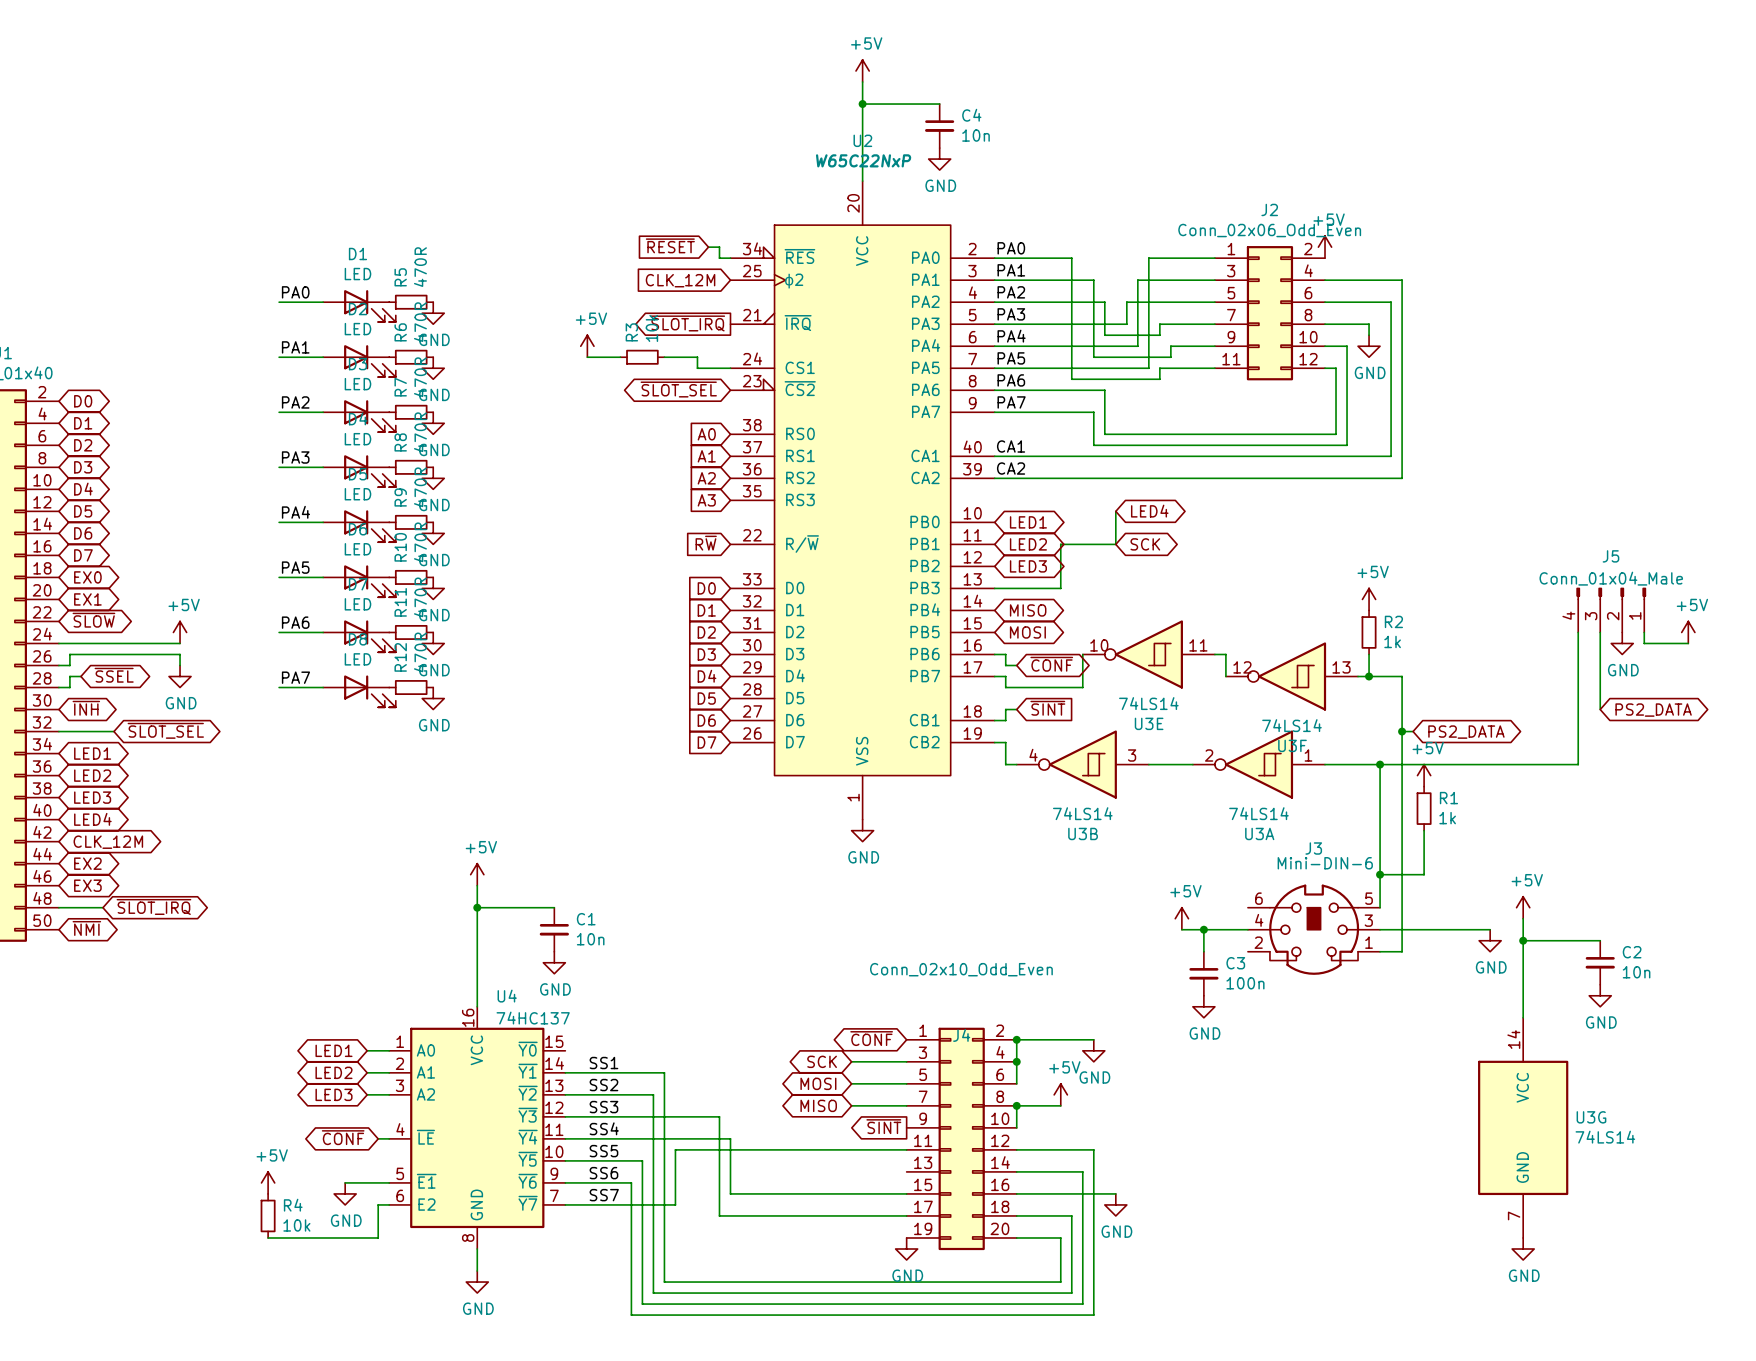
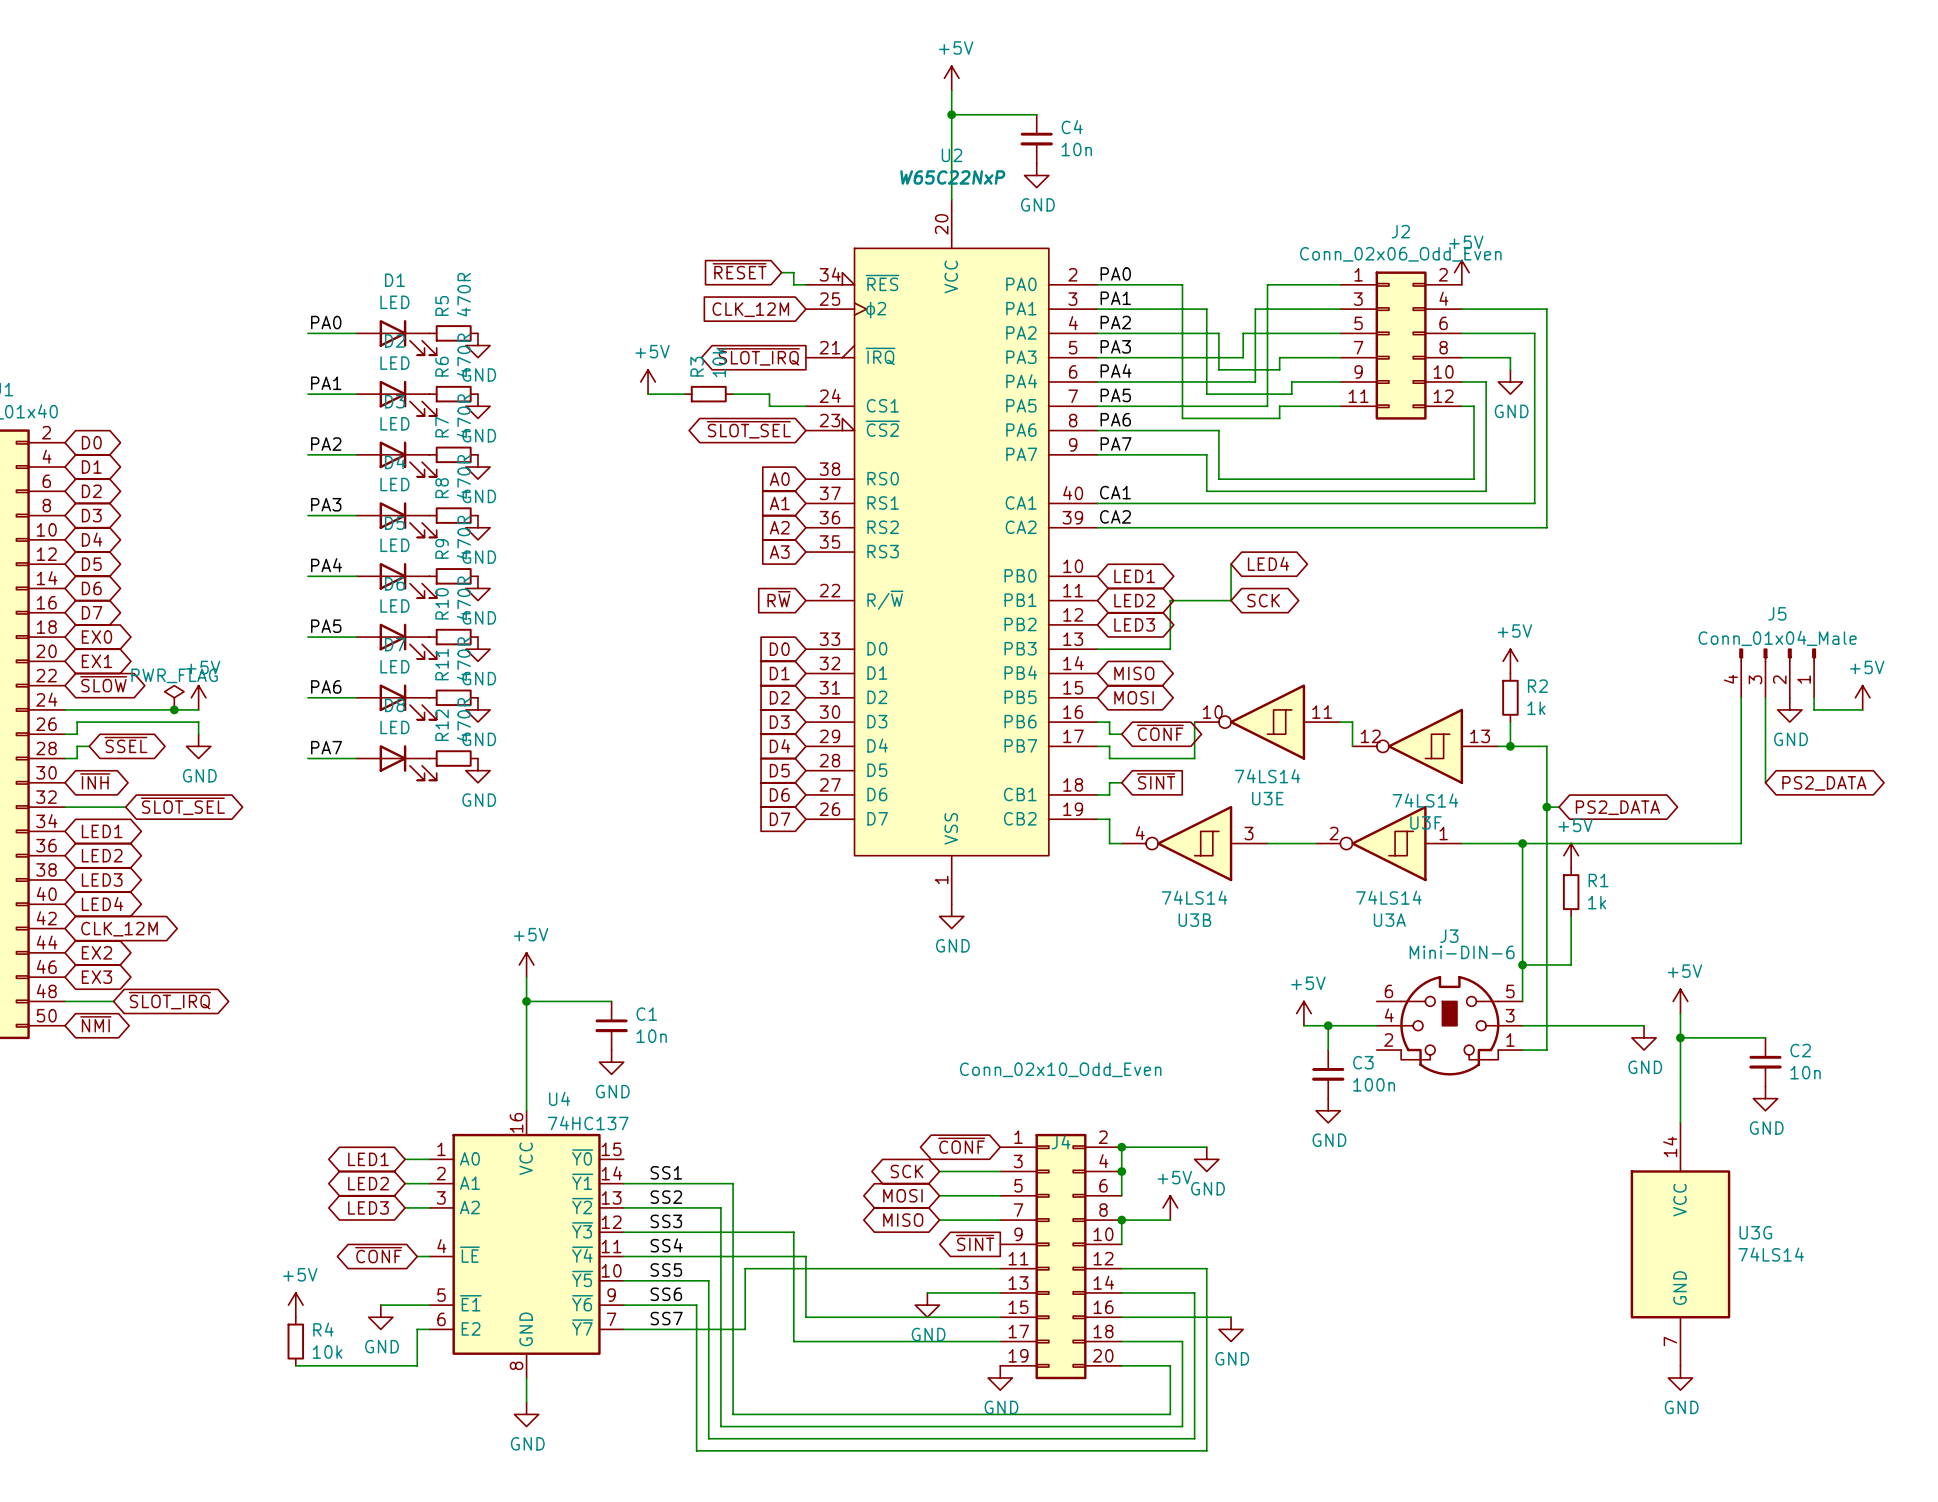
power symbol: none -> PWR_FLAG (174, 697)
junction: none -> (174, 709)
wire: none -> (927, 1292) (1000, 1292)
power symbol: none -> GND (927, 1305)

